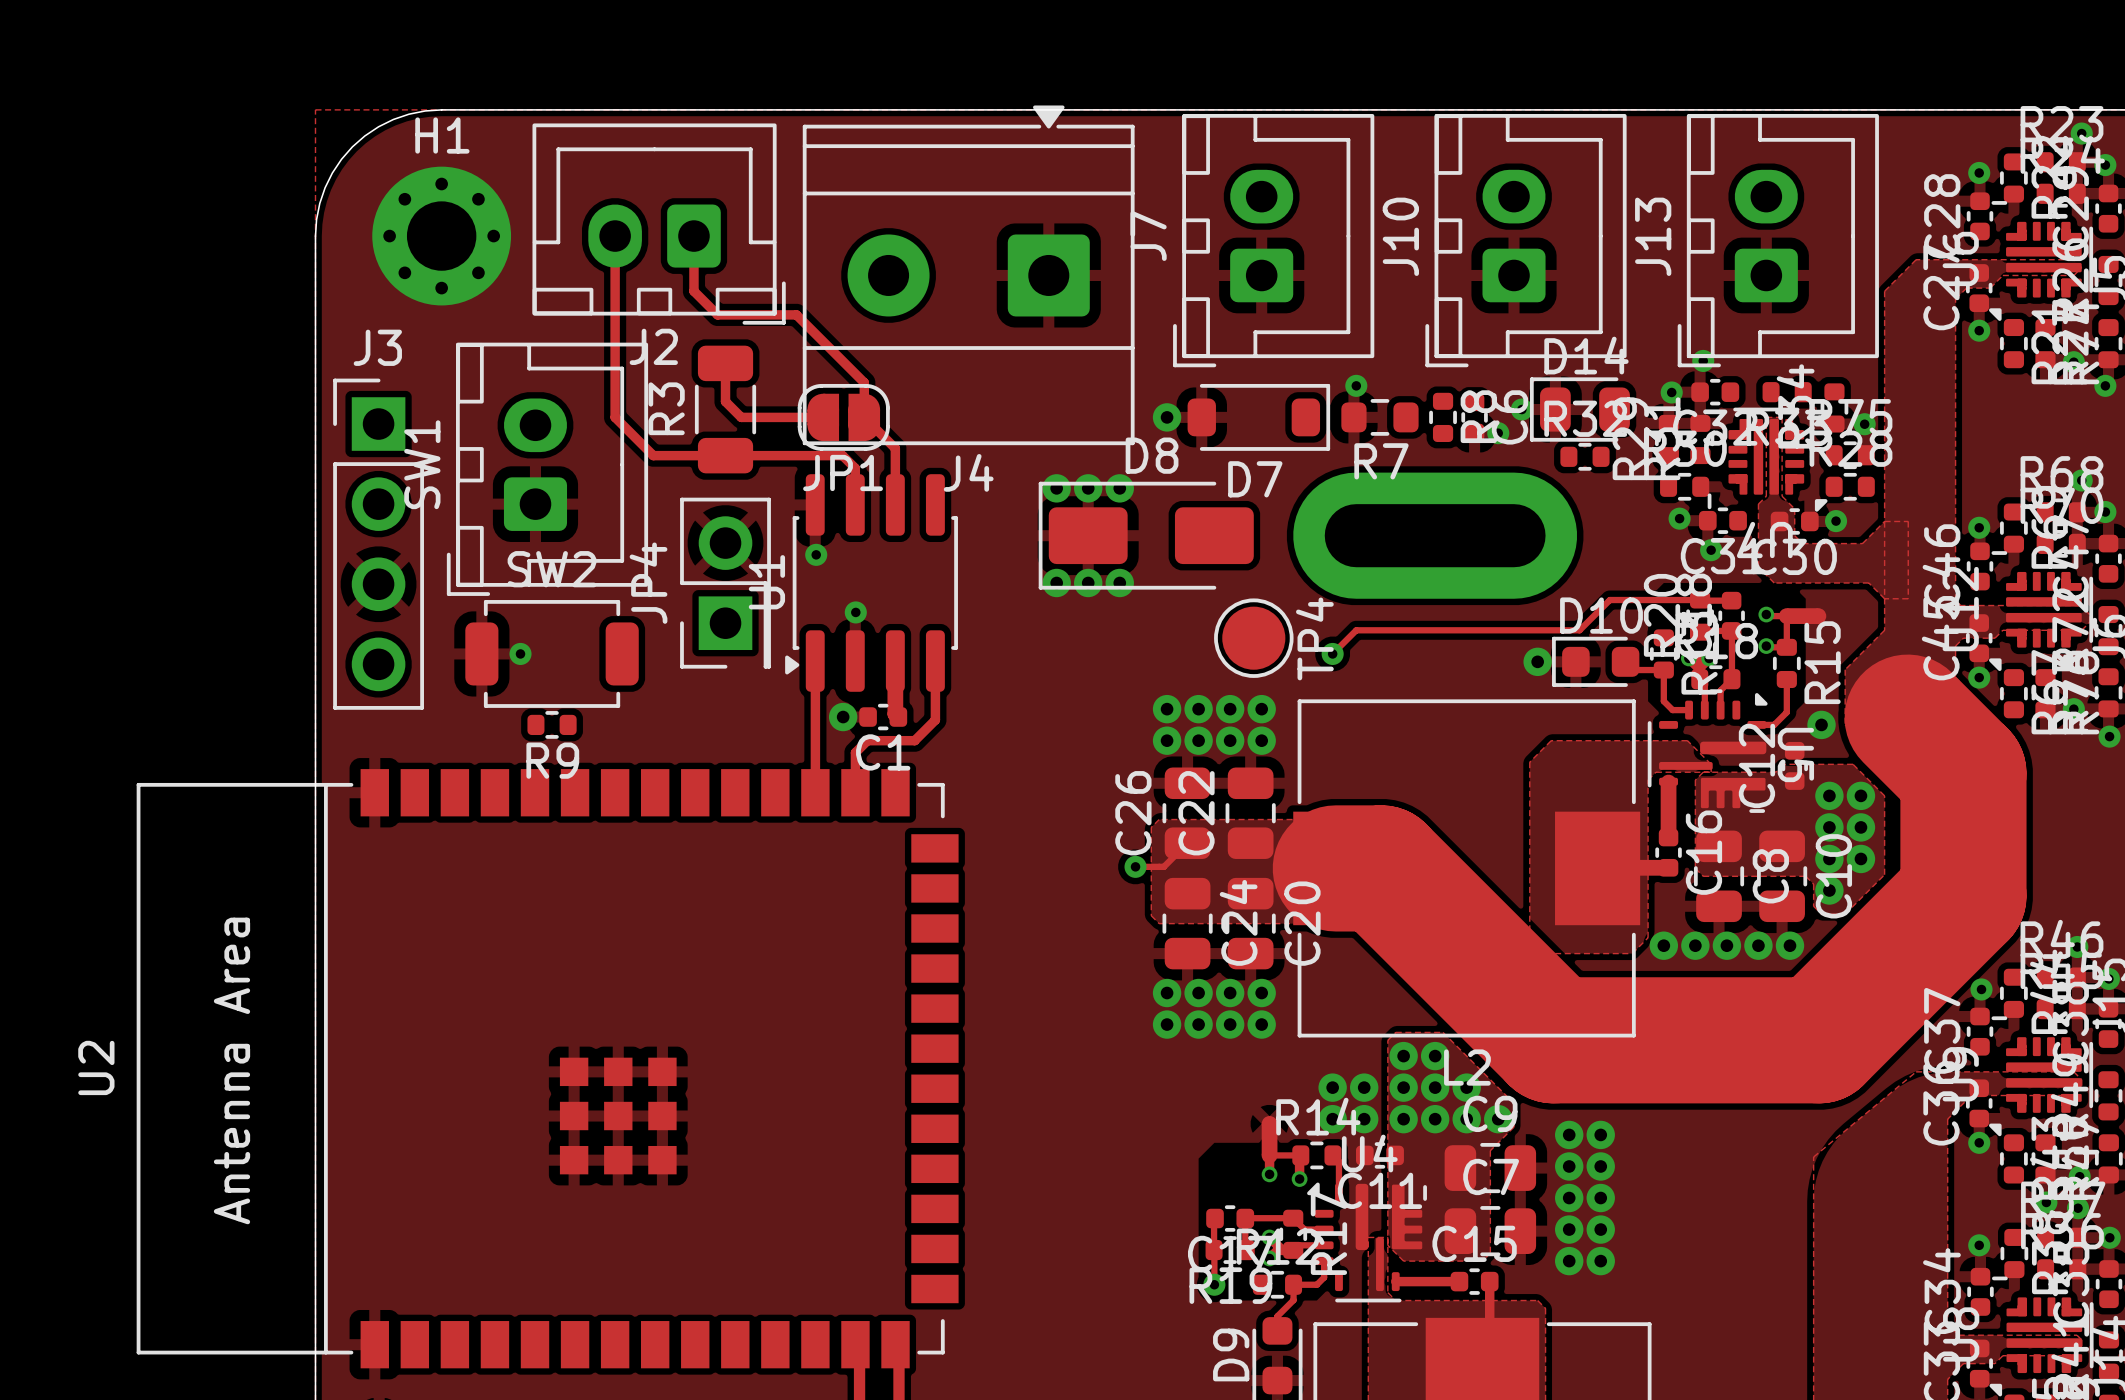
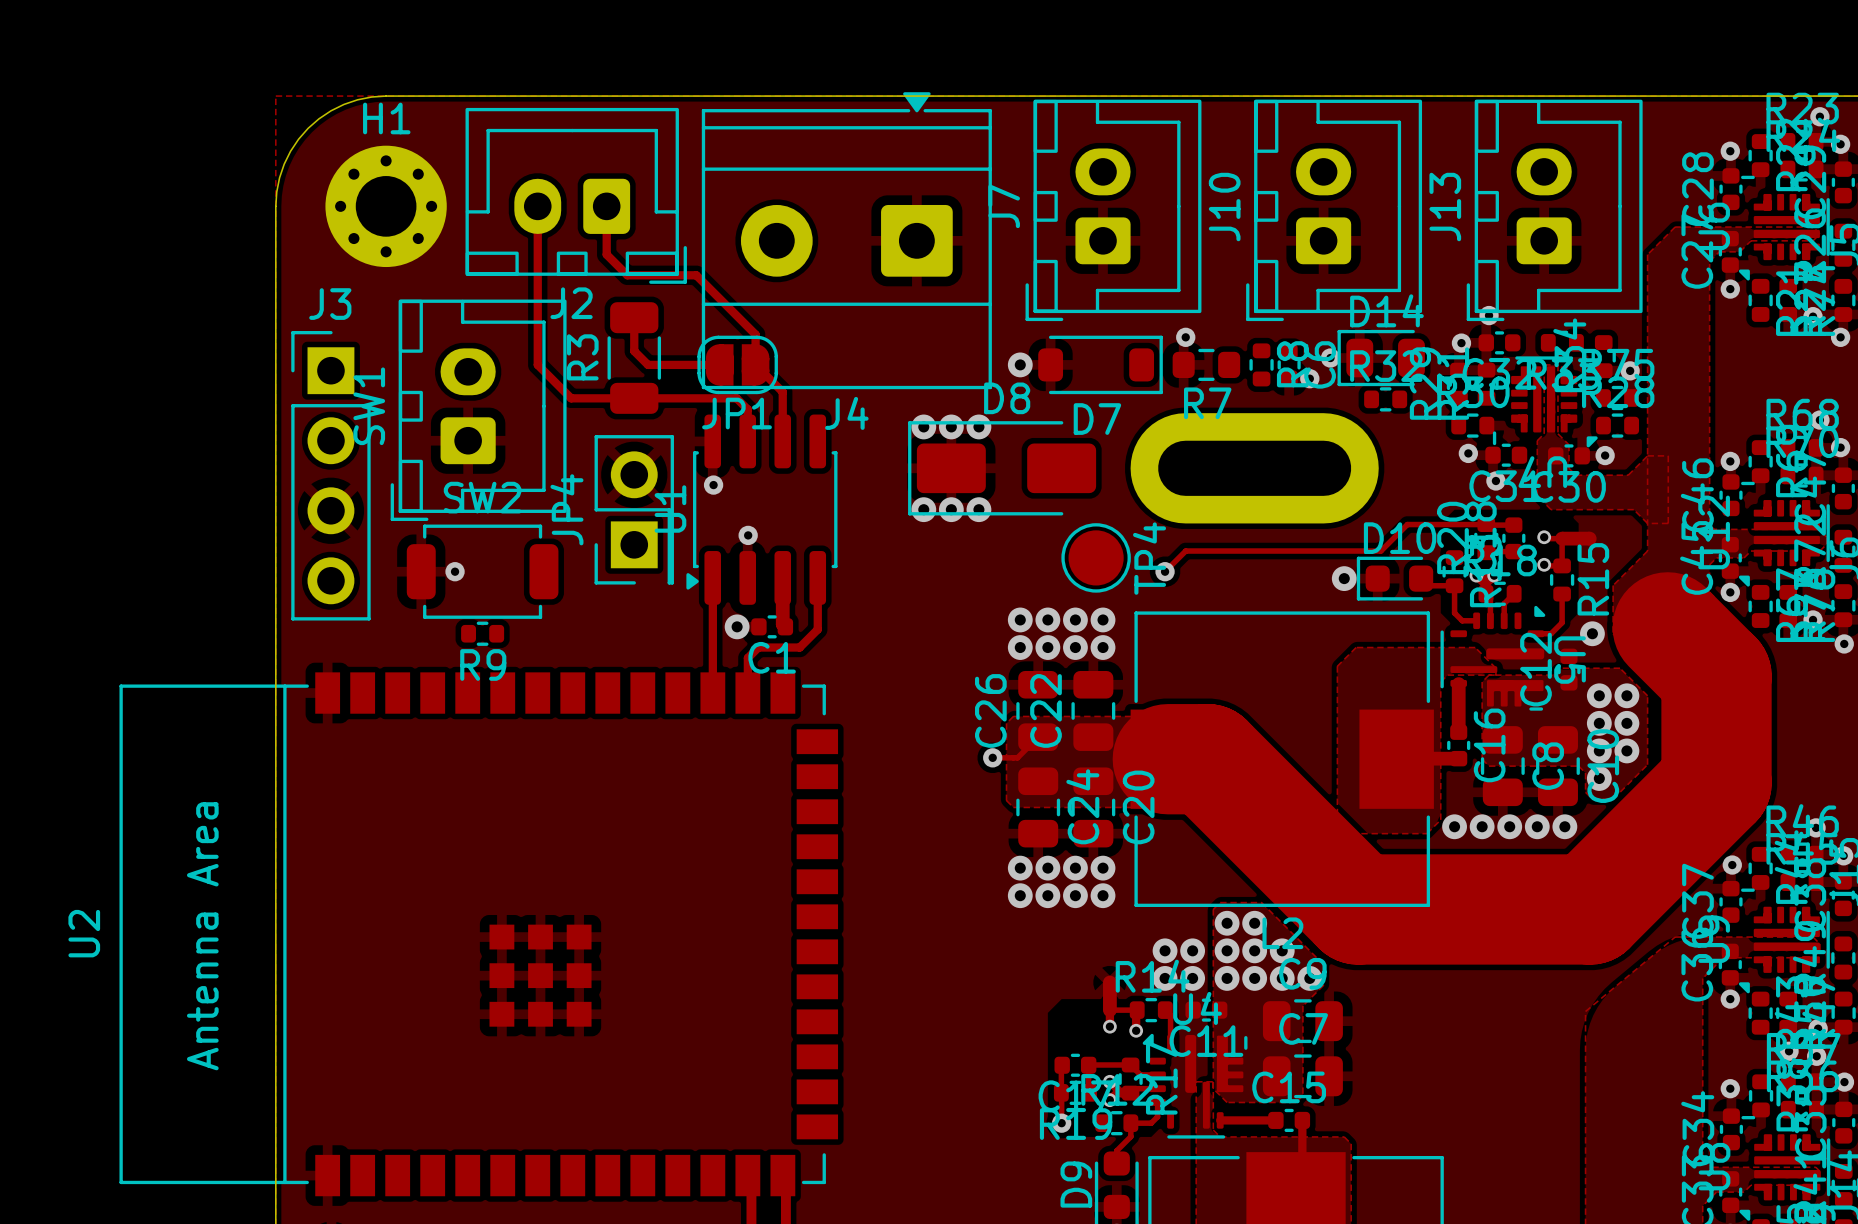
track: (1731, 631) (1731, 679) -> none
via: (1569, 1134) -> none
via: (1600, 1134) -> none
via: (1569, 1166) -> none
via: (1600, 1166) -> none
via: (1569, 1198) -> none
via: (1600, 1198) -> none
via: (1569, 1229) -> none
via: (1600, 1229) -> none
via: (1569, 1261) -> none
via: (1600, 1261) -> none

